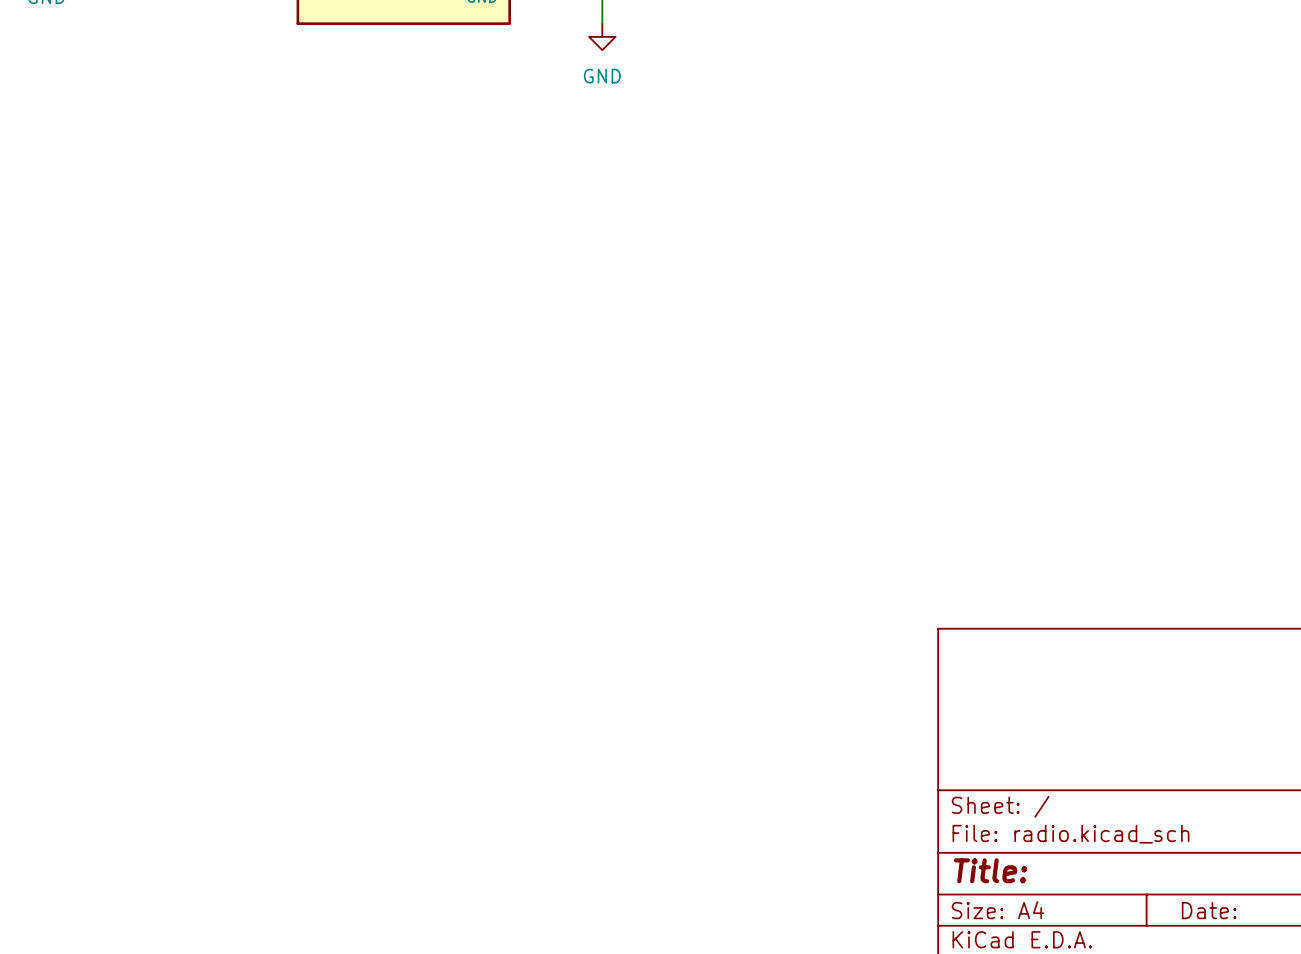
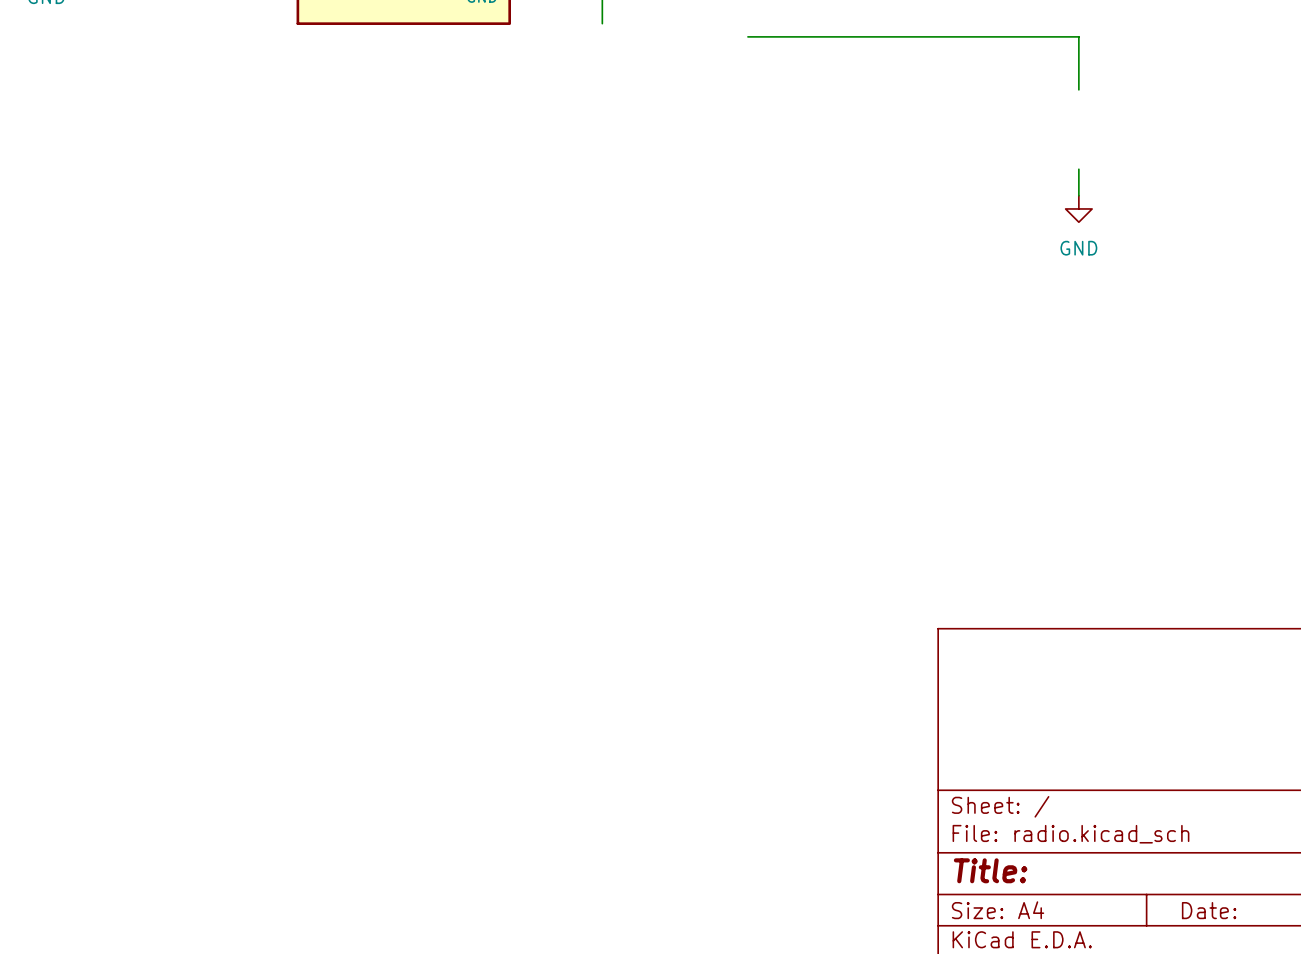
power symbol: GND (602, 36) -> none
wire: none -> (747, 36) (1078, 36) (1078, 89)
wire: none -> (1078, 169) (1078, 195)
power symbol: none -> GND (1078, 208)

